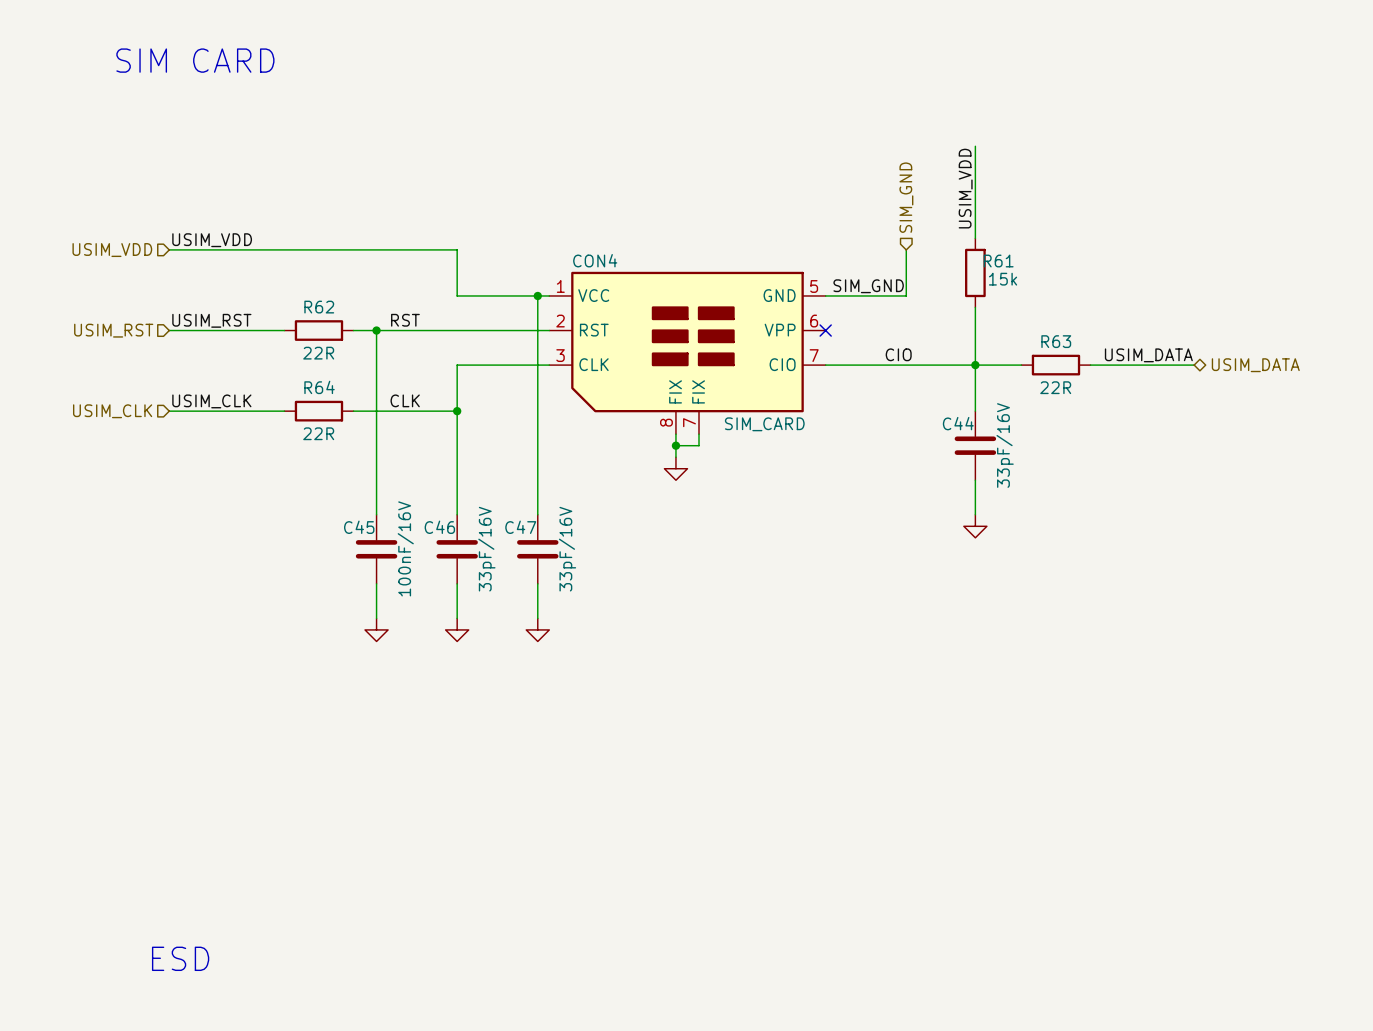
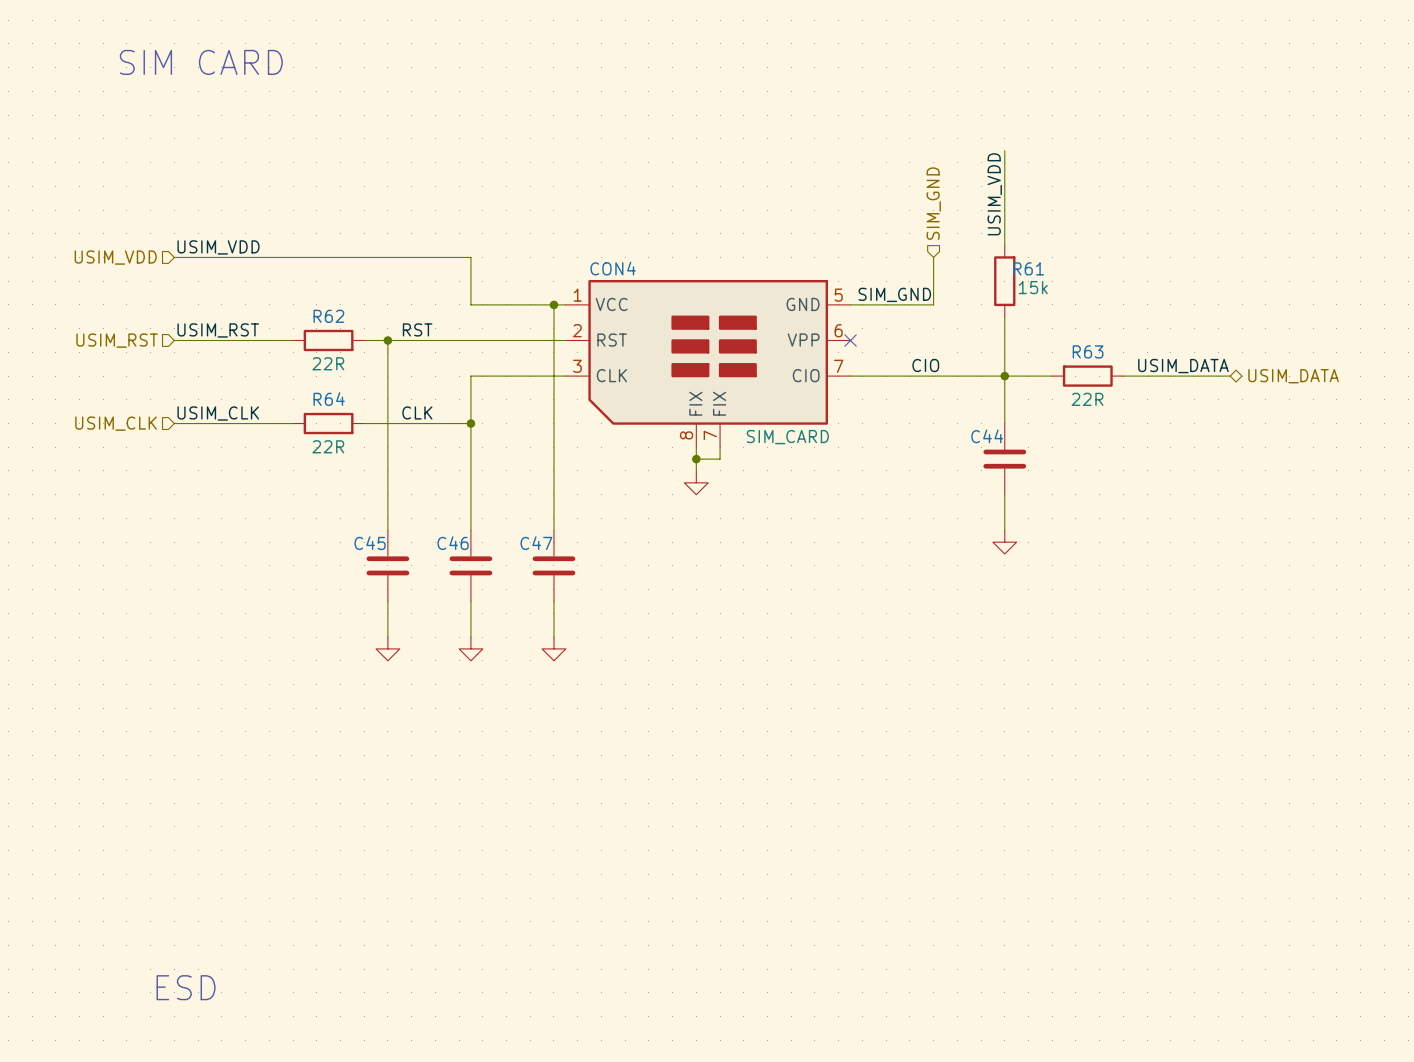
C44 value: 33pF/16V (1005, 445) -> none
C45 value: 100nF/16V (405, 548) -> none
C46 value: 33pF/16V (486, 549) -> none
C47 value: 33pF/16V (567, 549) -> none

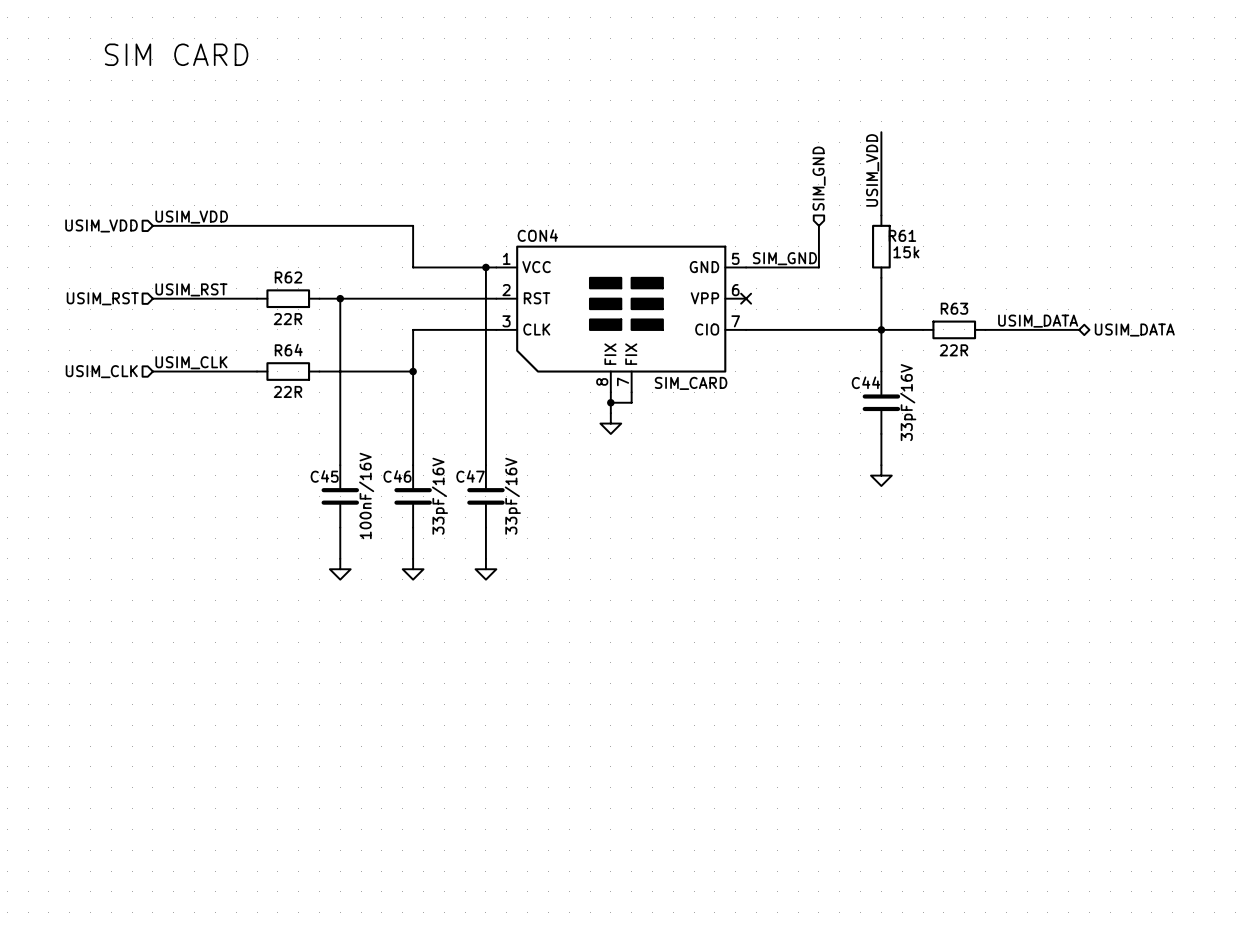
label: RST (417, 329) -> none
label: CIO (925, 365) -> none
label: CLK (417, 412) -> none
C44 value: none -> 33pF/16V (908, 402)
C45 value: none -> 100nF/16V (366, 495)
C46 value: none -> 33pF/16V (439, 496)
C47 value: none -> 33pF/16V (512, 496)
text: ESD (186, 987) -> none

